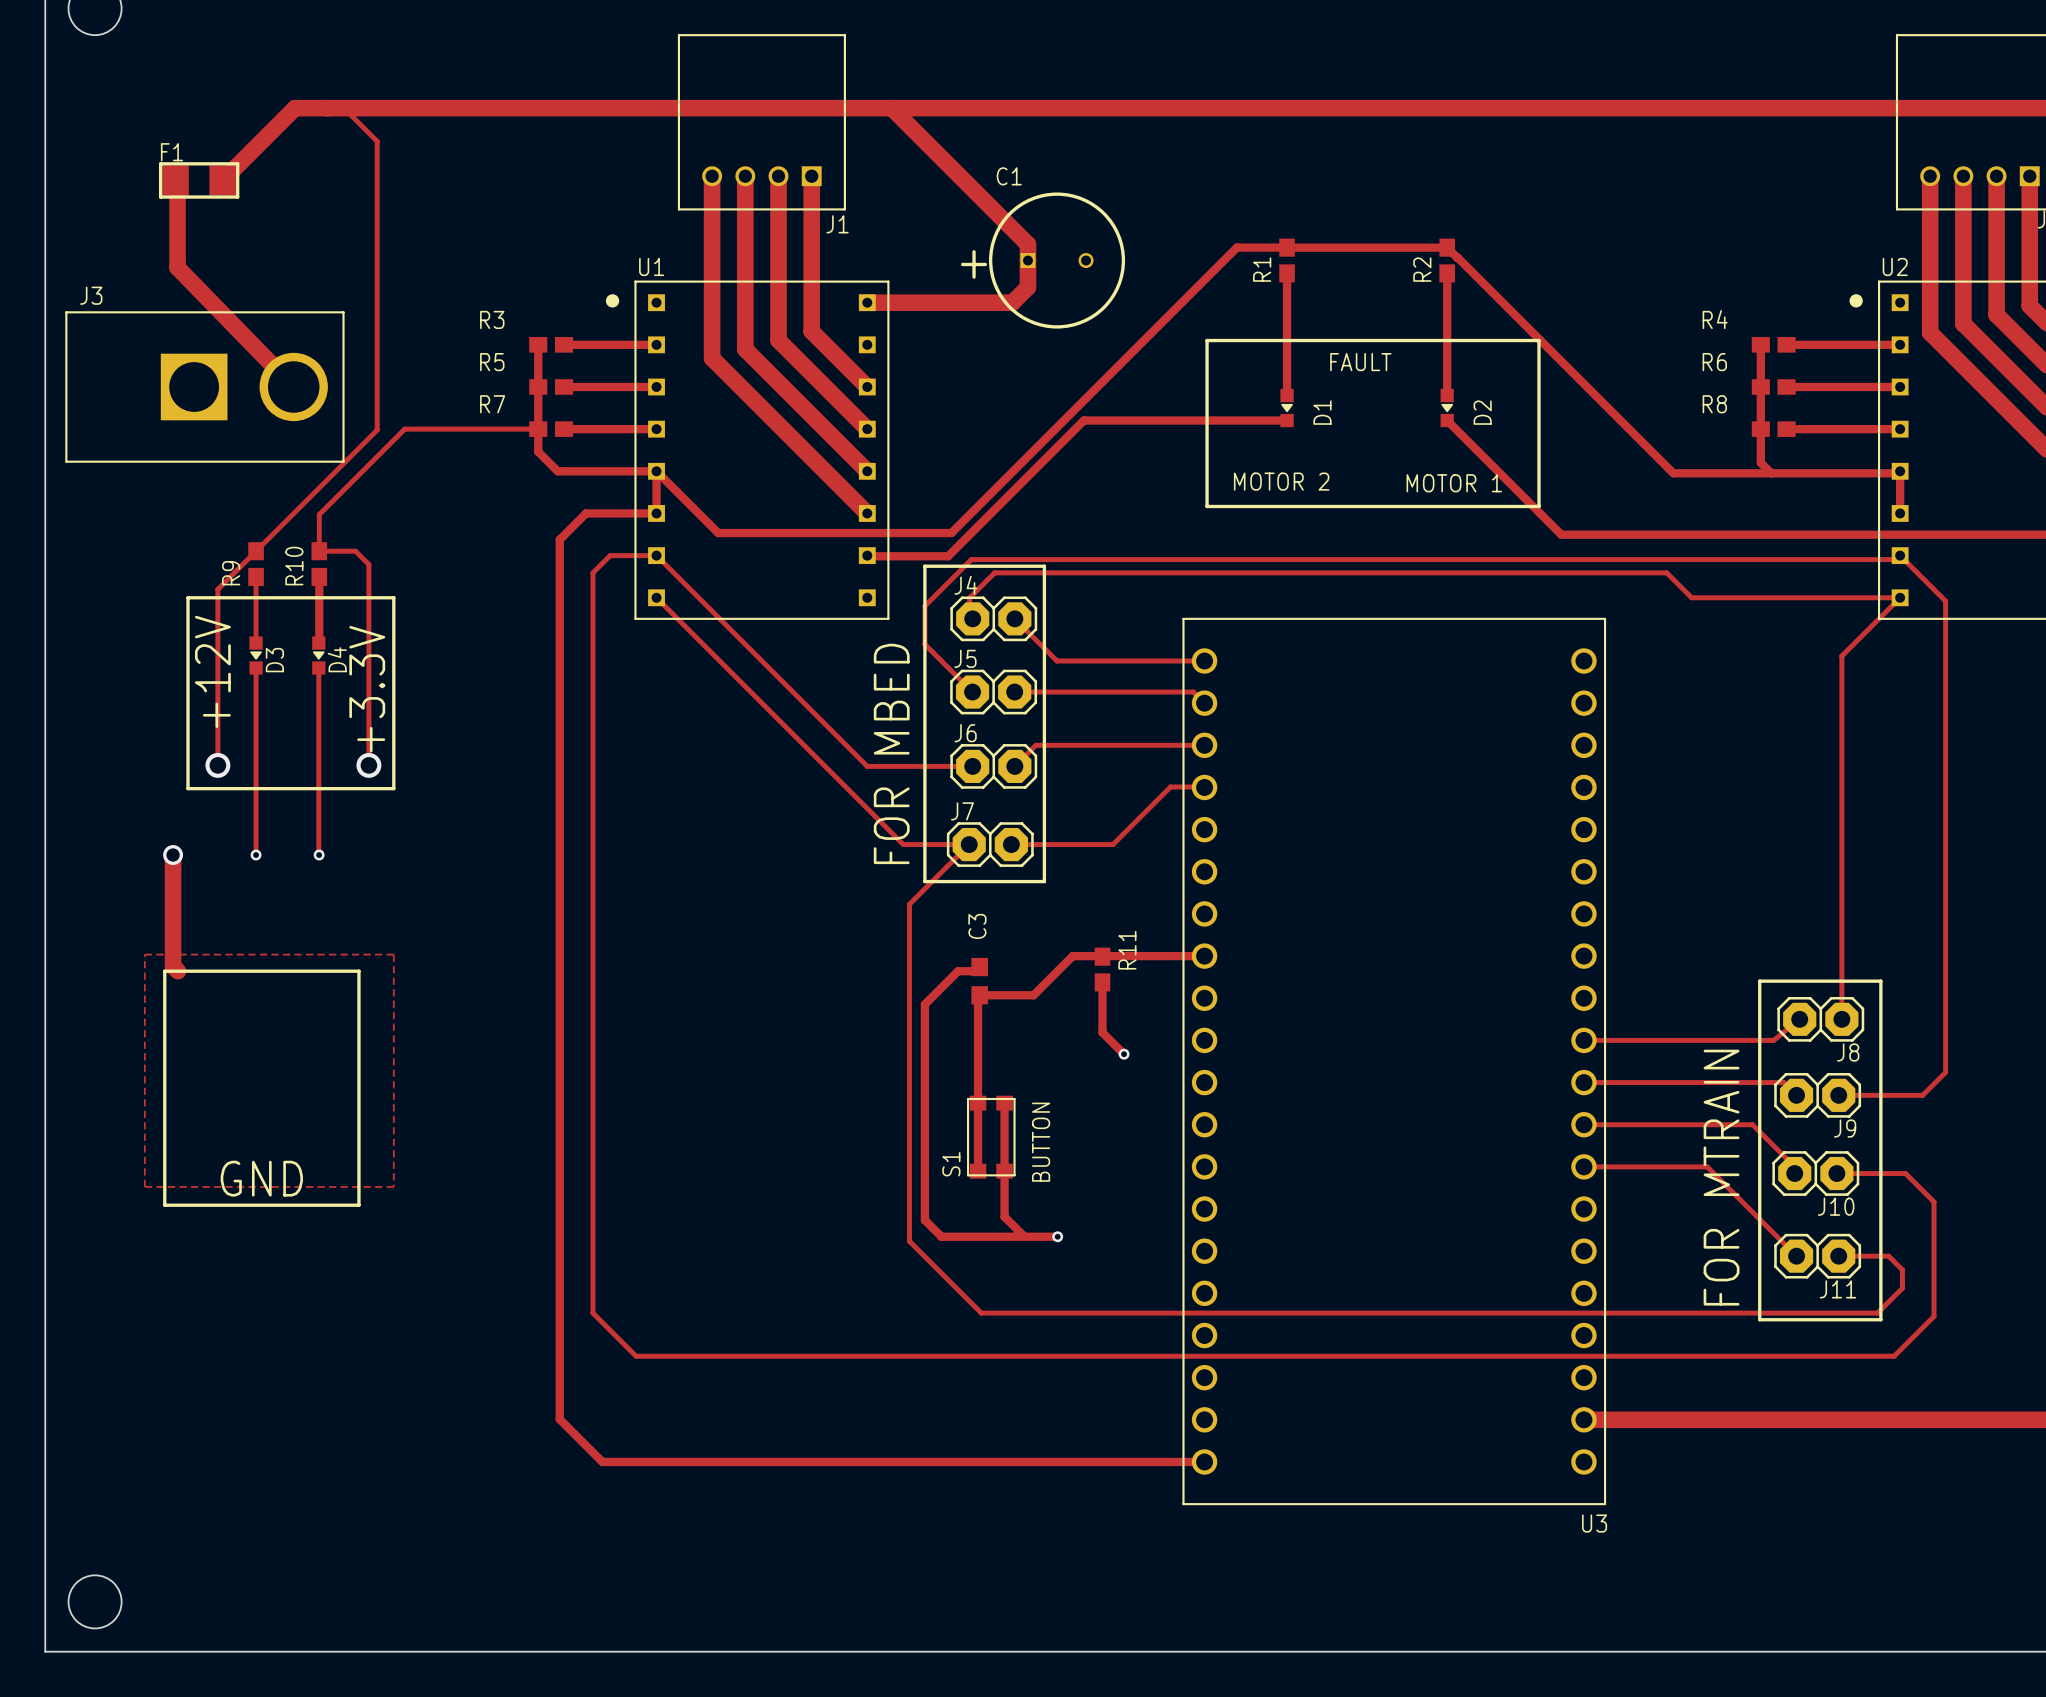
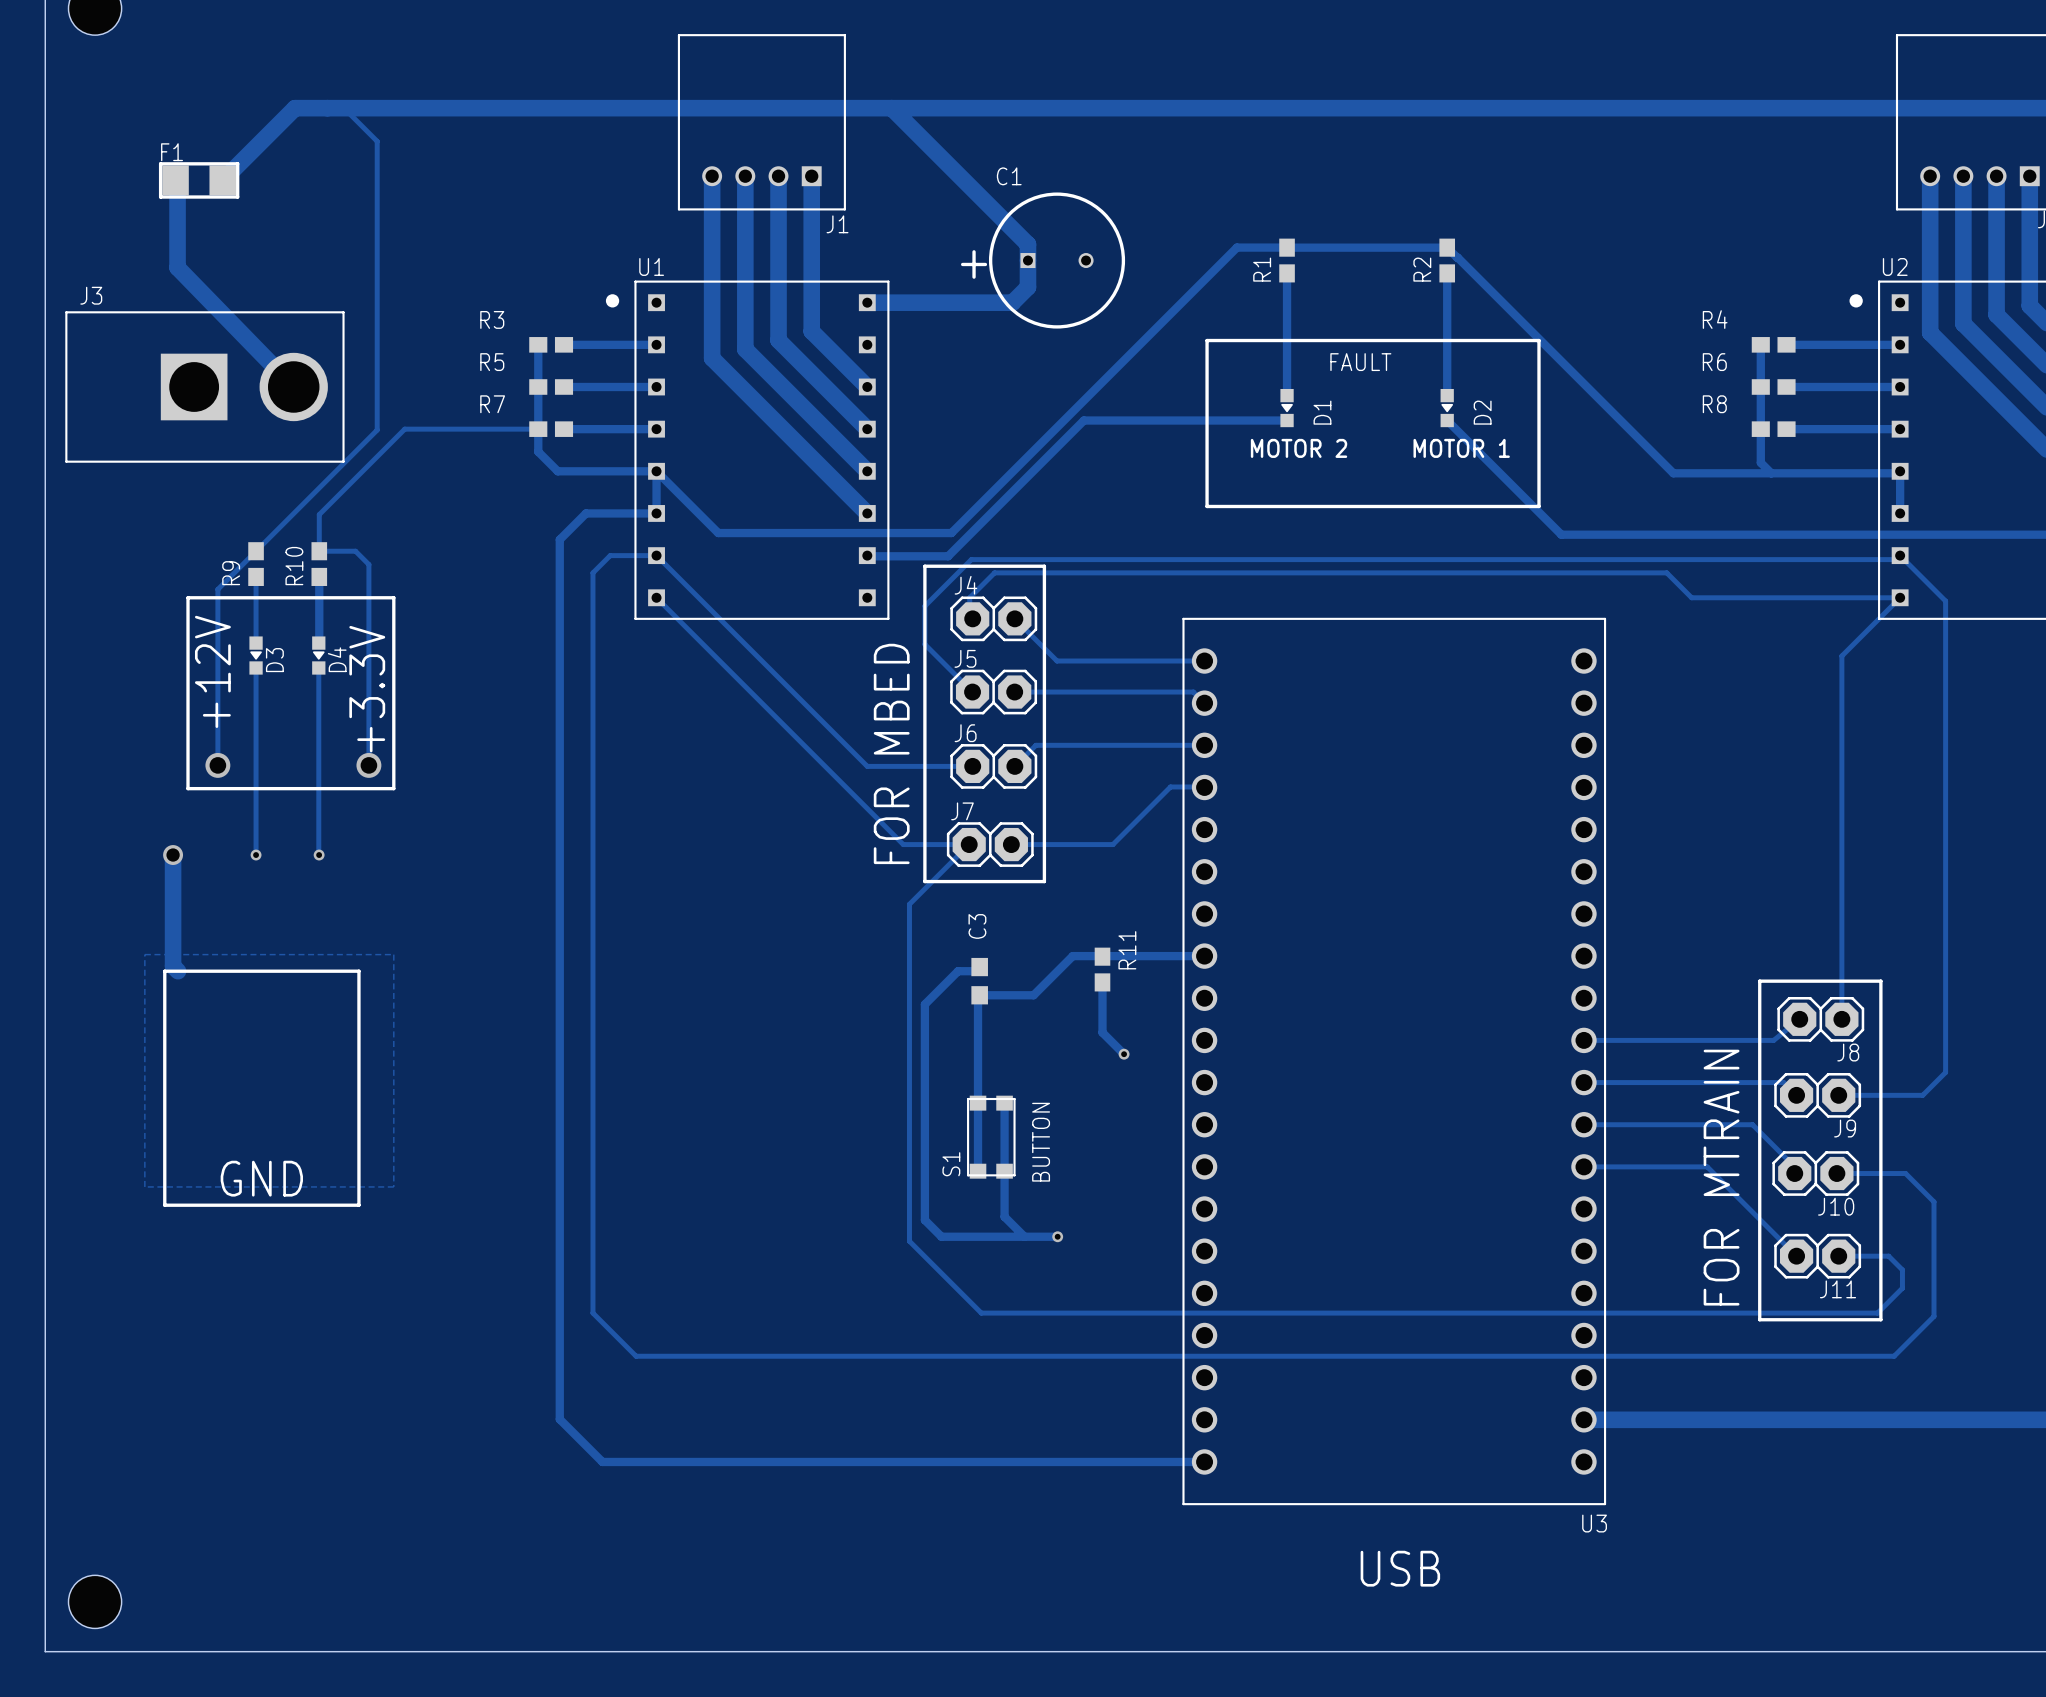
text position: MOTOR 2 (1281, 481) -> MOTOR 2 (1299, 448)
text position: MOTOR 1 (1454, 483) -> MOTOR 1 (1461, 448)
text: none -> USB (1400, 1568)

